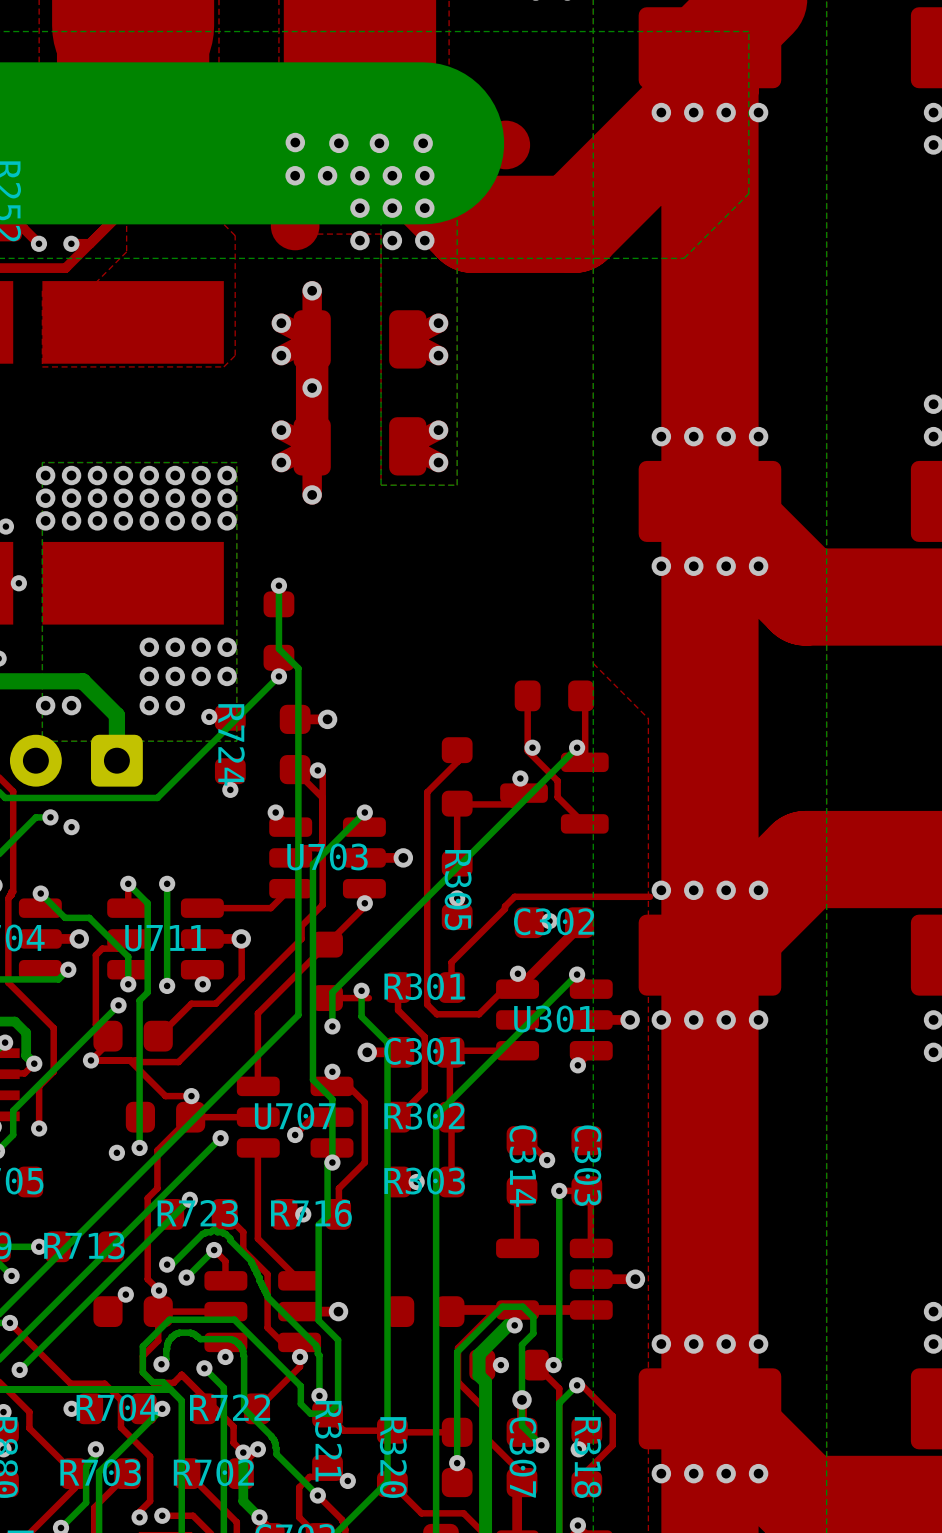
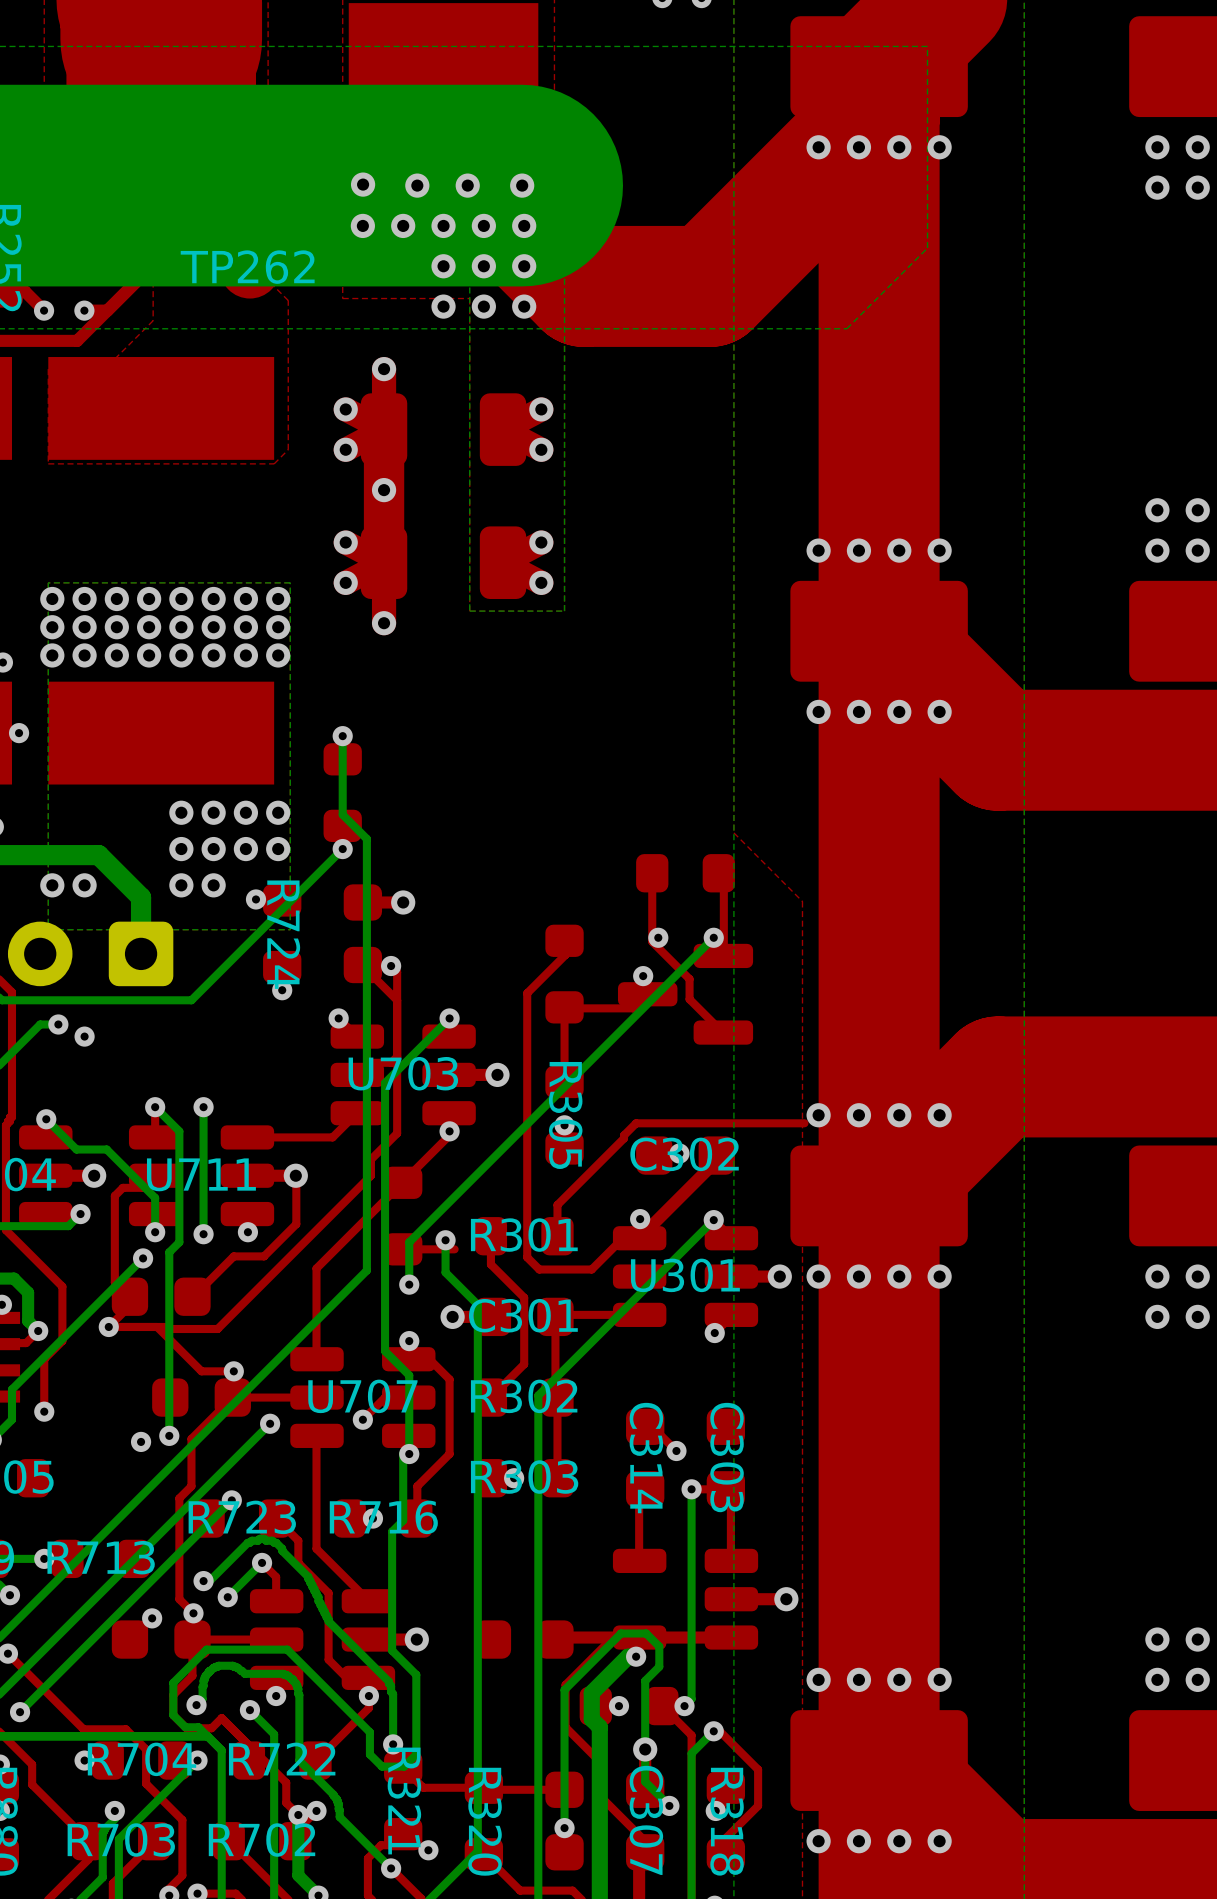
part: (505, 144) -> none
TP262: none -> (249, 268)
part: (295, 225) -> none

